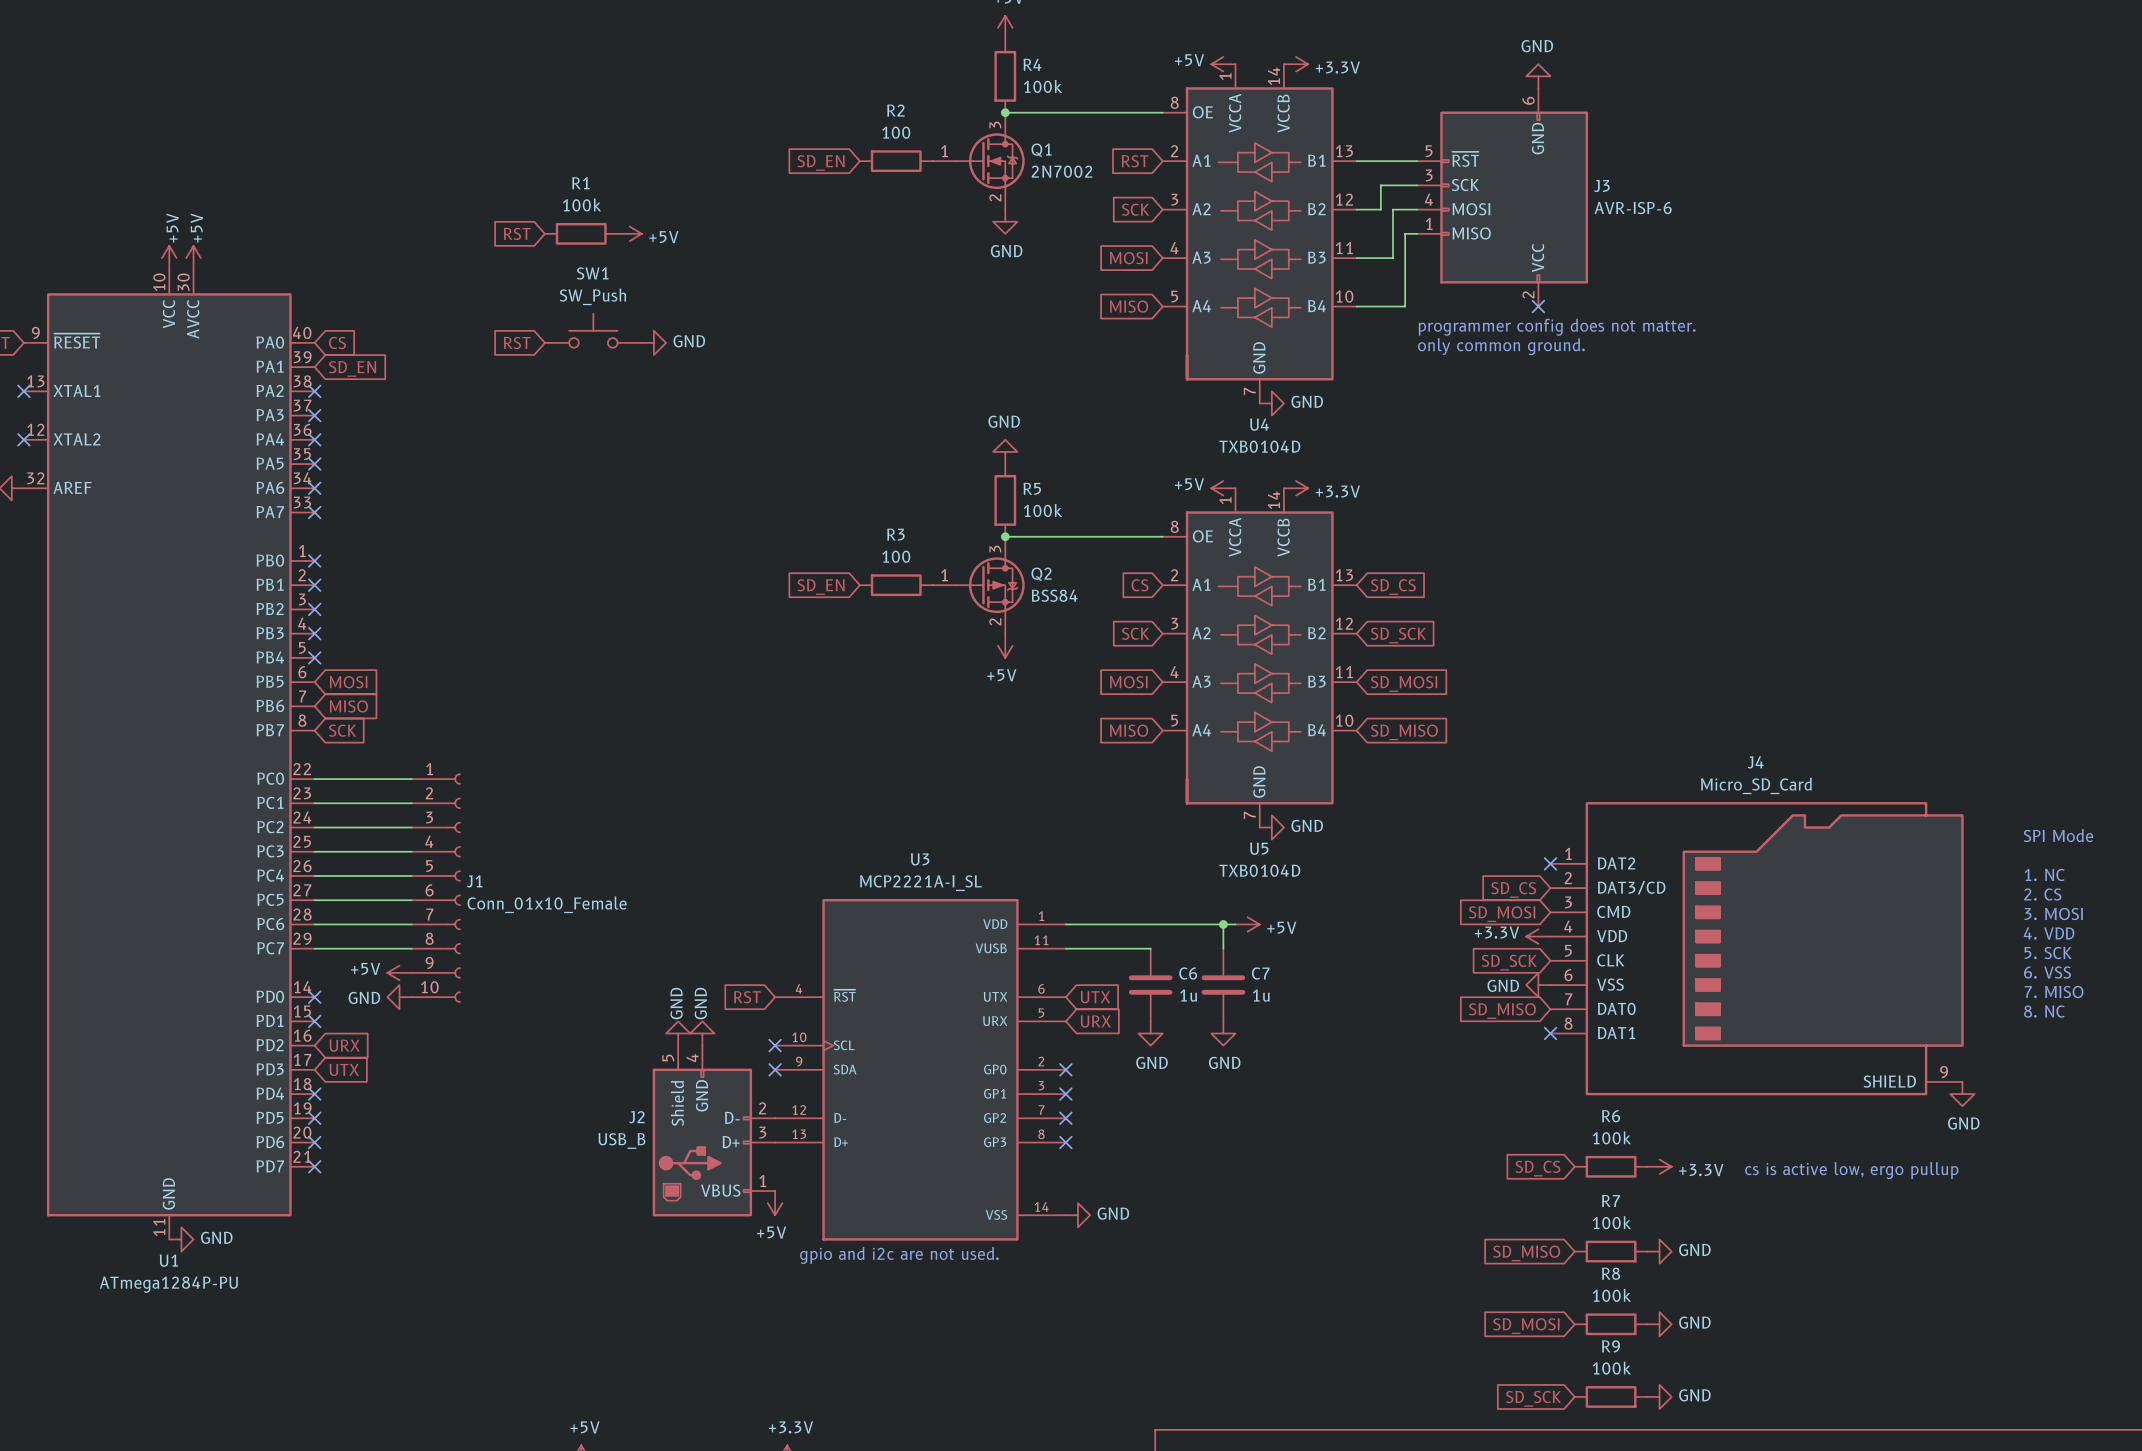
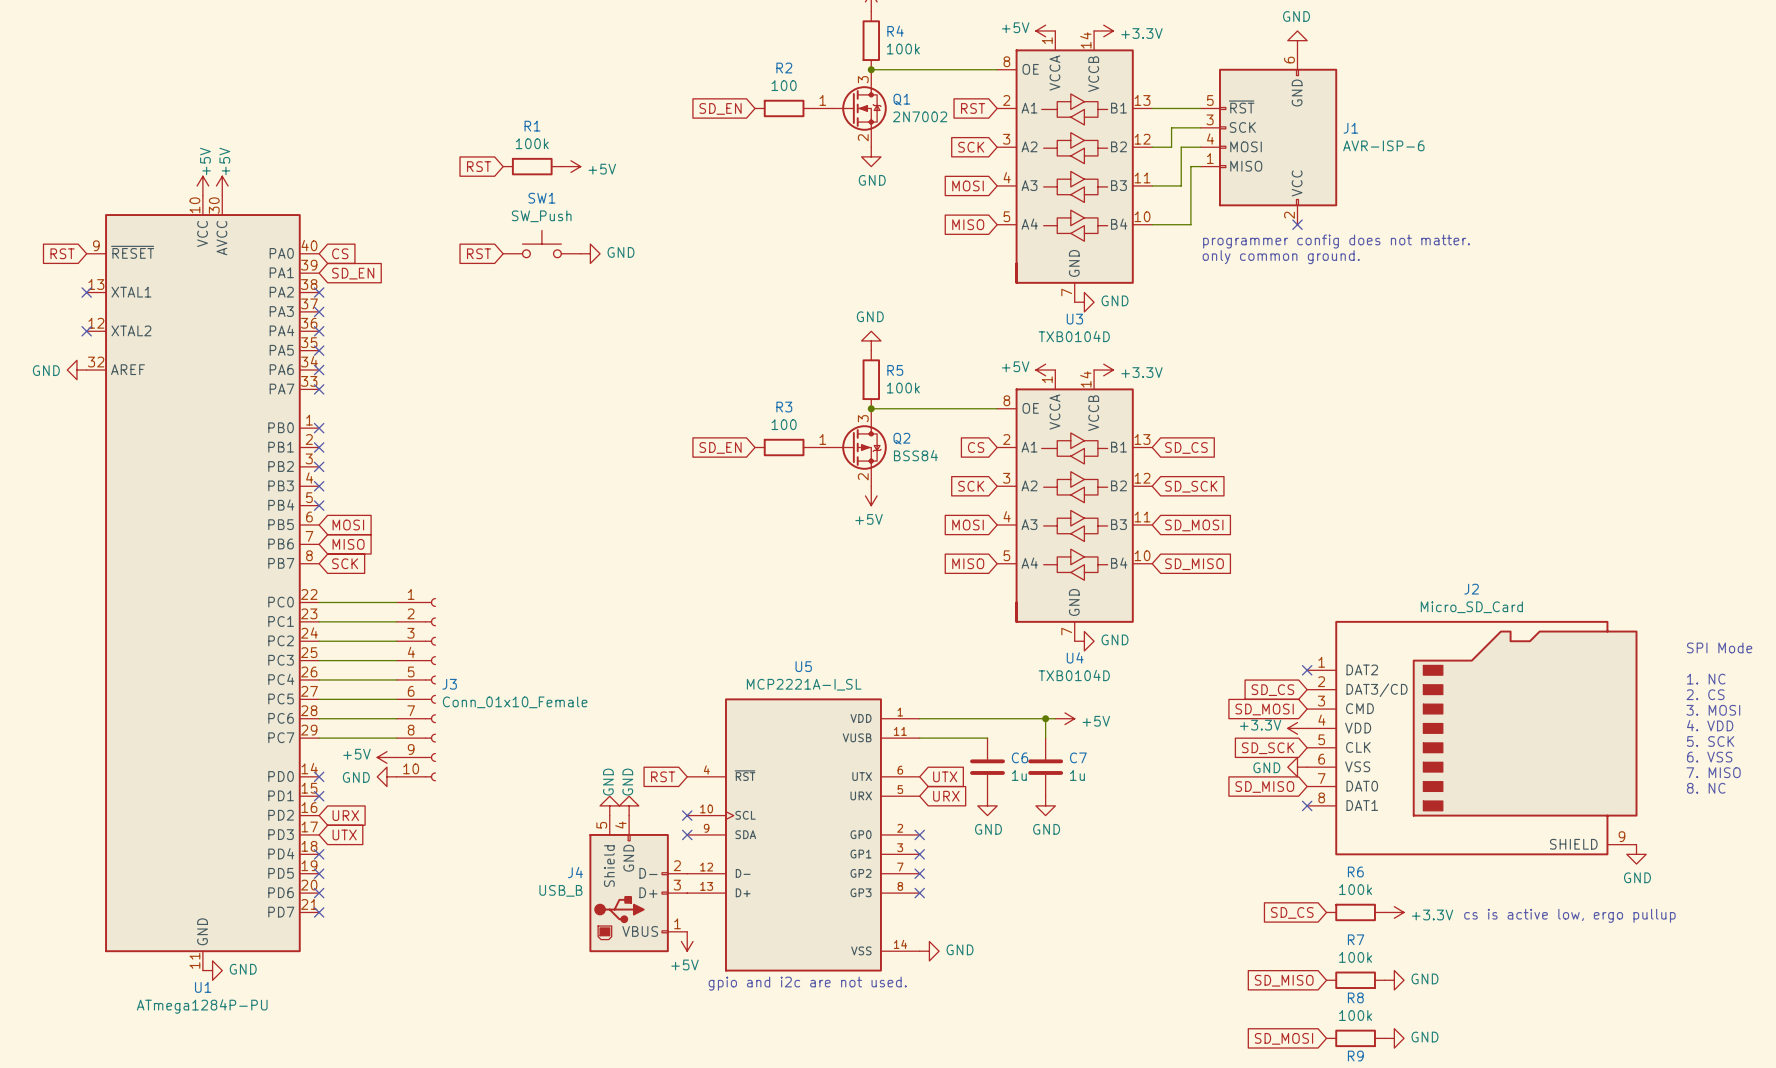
J3 name: J3 (1601, 185) -> J1 (1350, 128)
U4 name: U4 (1259, 424) -> U3 (1074, 319)
J4 name: J4 (1755, 762) -> J2 (1471, 589)
U5 name: U5 (1259, 848) -> U4 (1075, 657)
U3 name: U3 (920, 859) -> U5 (803, 666)
J1 name: J1 (474, 881) -> J3 (449, 684)
J2 name: J2 (636, 1117) -> J4 (575, 872)

